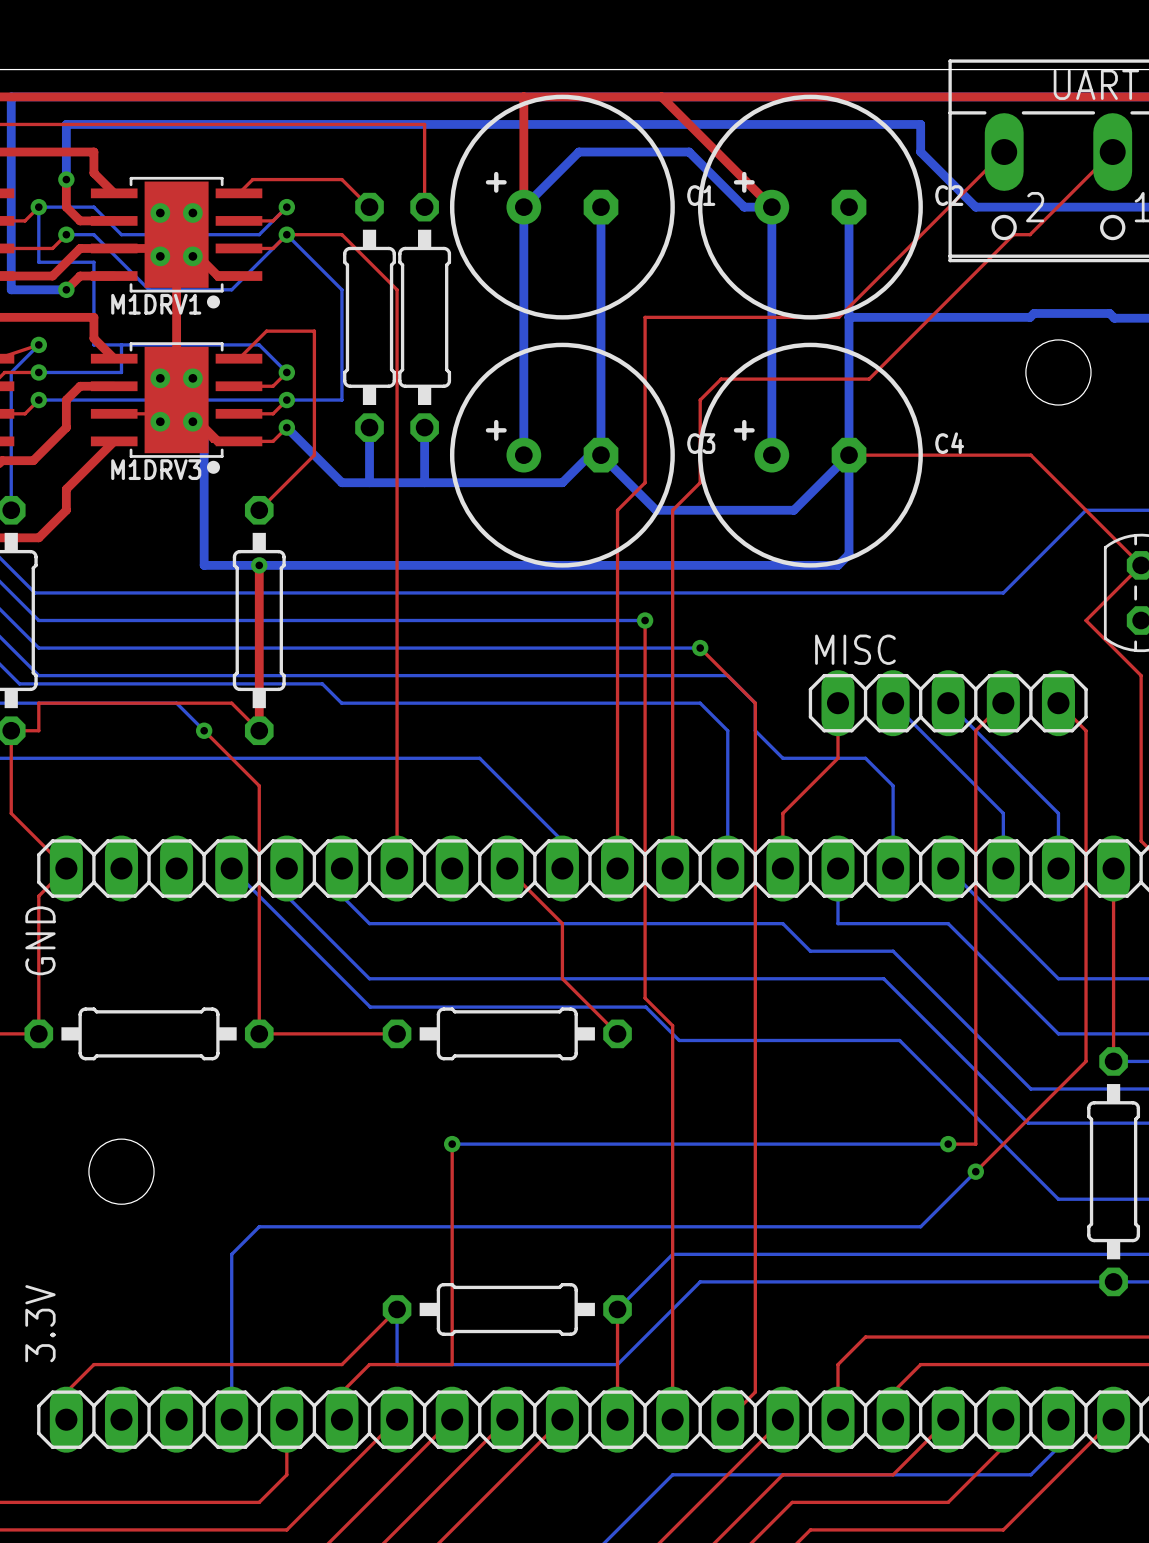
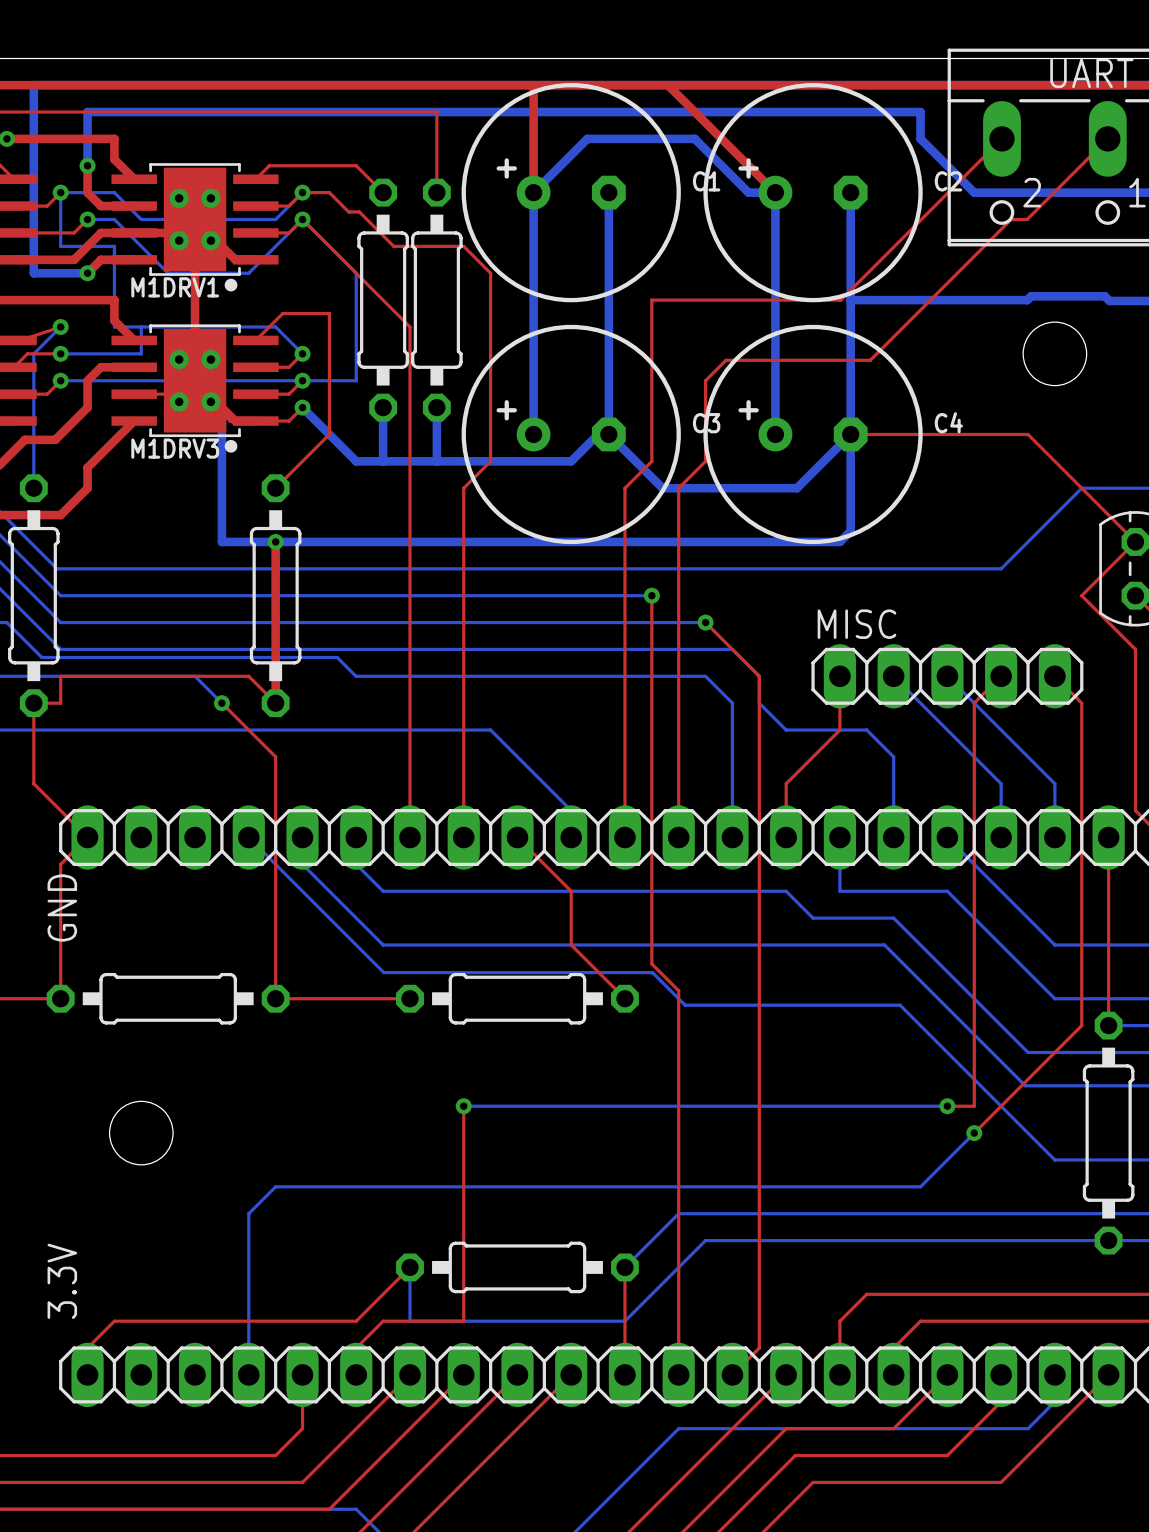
top track: none -> (302, 192) (329, 192) (348, 211) (359, 211) (393, 246) (463, 246) (490, 273) (490, 461) (463, 488) (463, 837)
top track: (286, 234) (341, 234) (397, 289) (397, 344) -> (302, 219) (410, 326)

